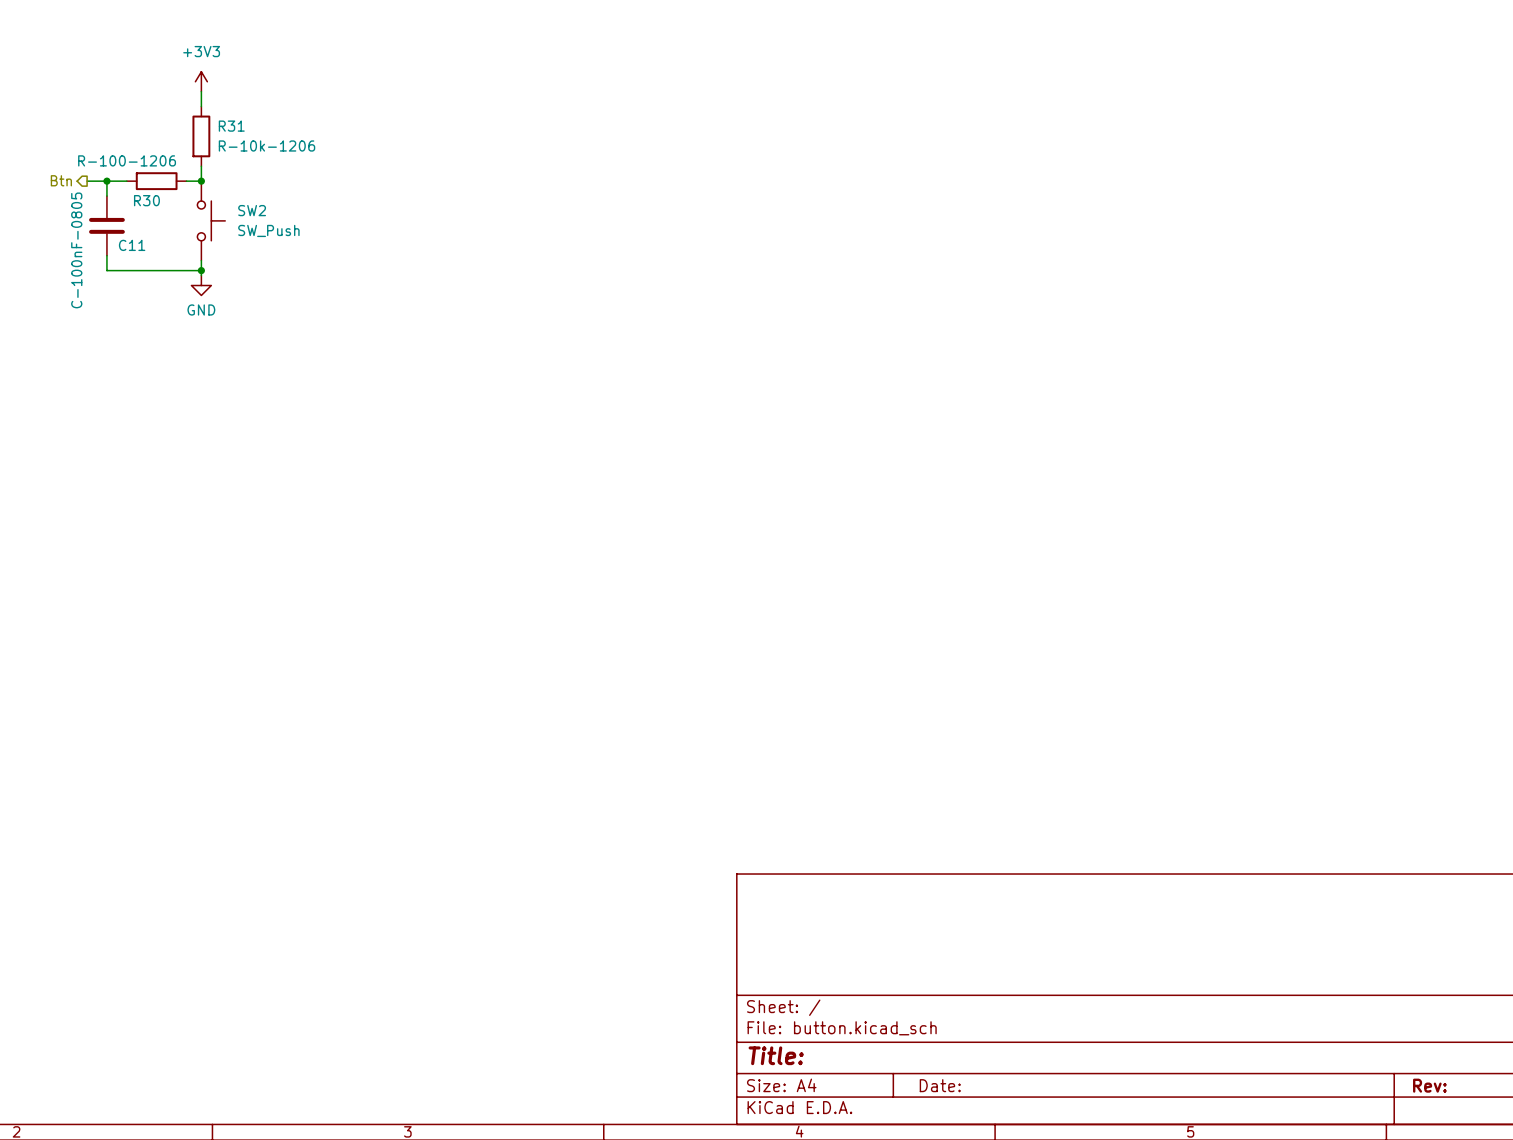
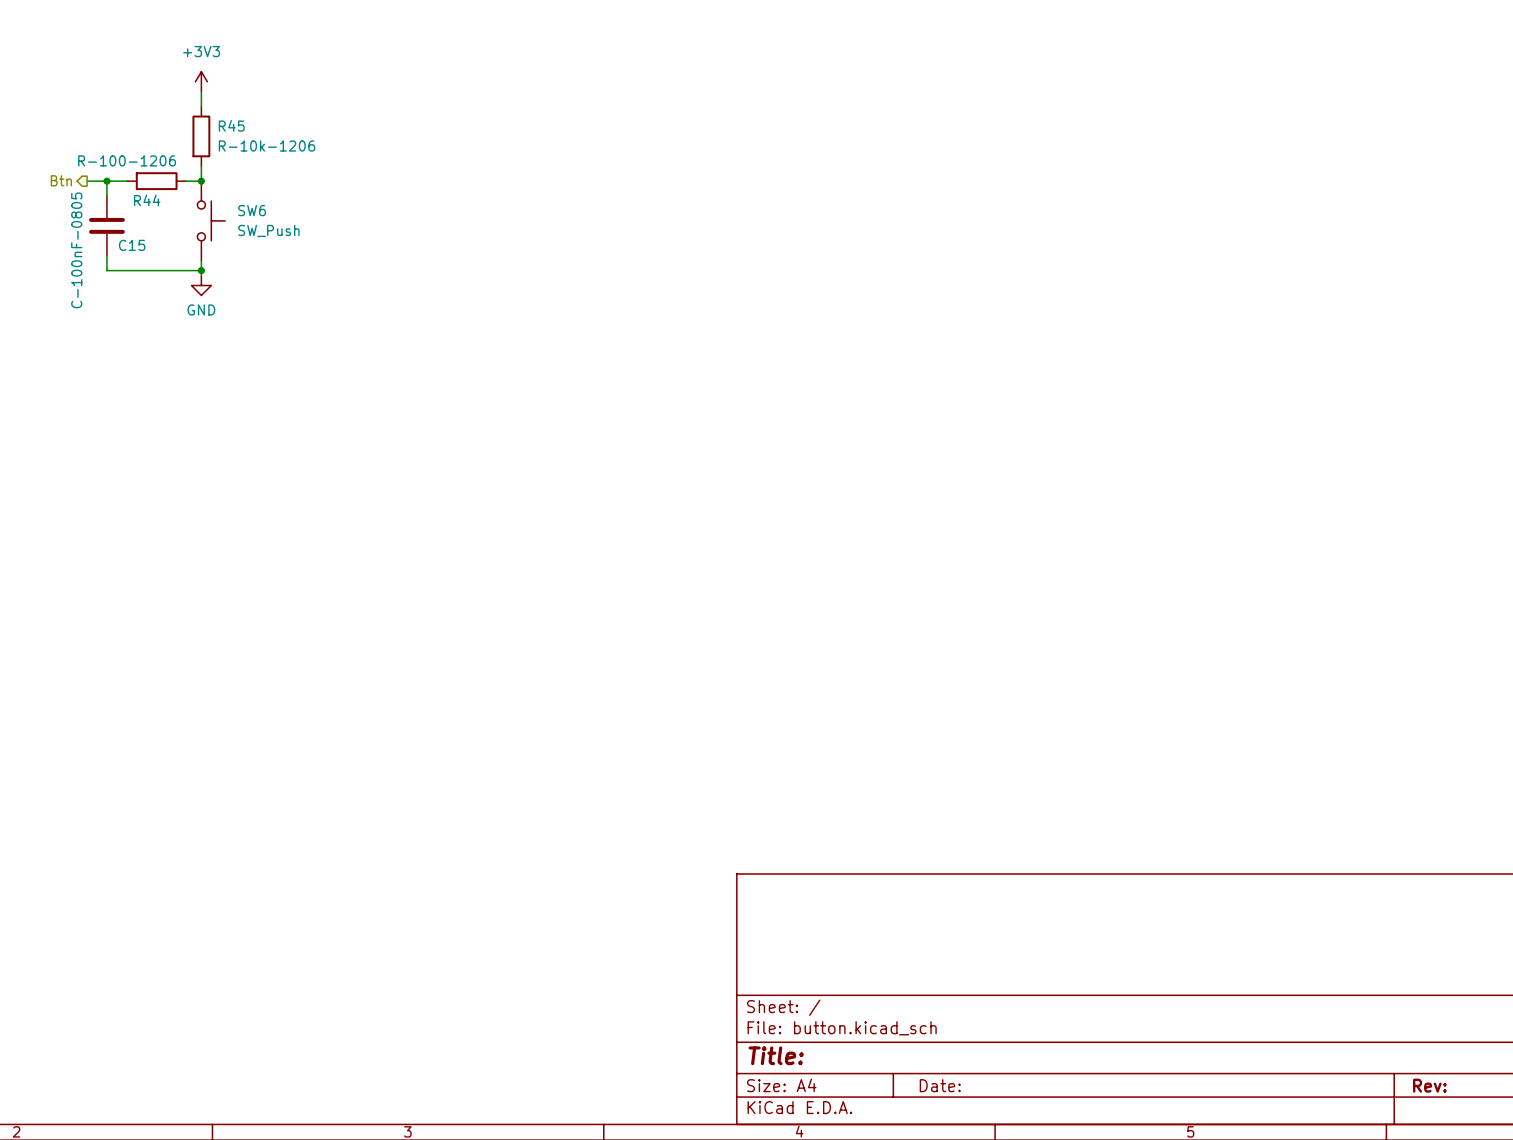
R31 name: R31 (231, 126) -> R45 (231, 125)
R30 name: R30 (146, 200) -> R44 (147, 200)
SW2 name: SW2 (252, 210) -> SW6 (252, 210)
C11 name: C11 (132, 245) -> C15 (132, 245)

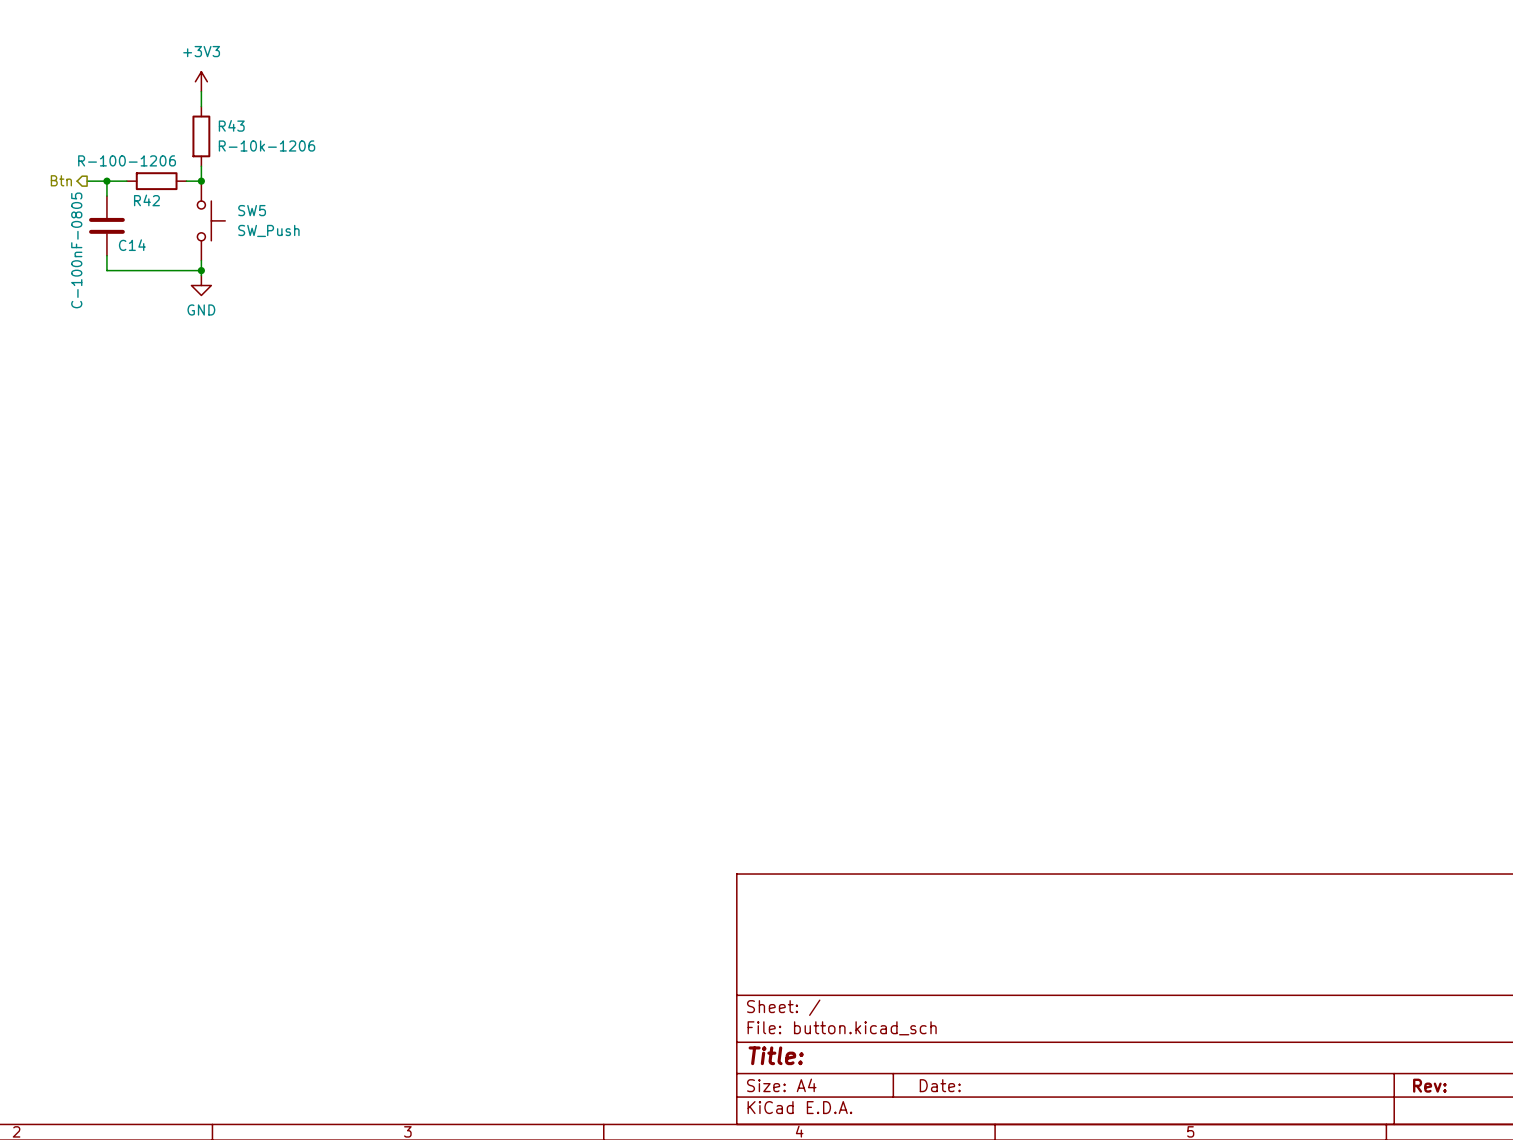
R45 name: R45 (231, 125) -> R43 (231, 125)
R44 name: R44 (147, 200) -> R42 (146, 200)
SW6 name: SW6 (252, 210) -> SW5 (252, 210)
C15 name: C15 (132, 245) -> C14 (132, 245)

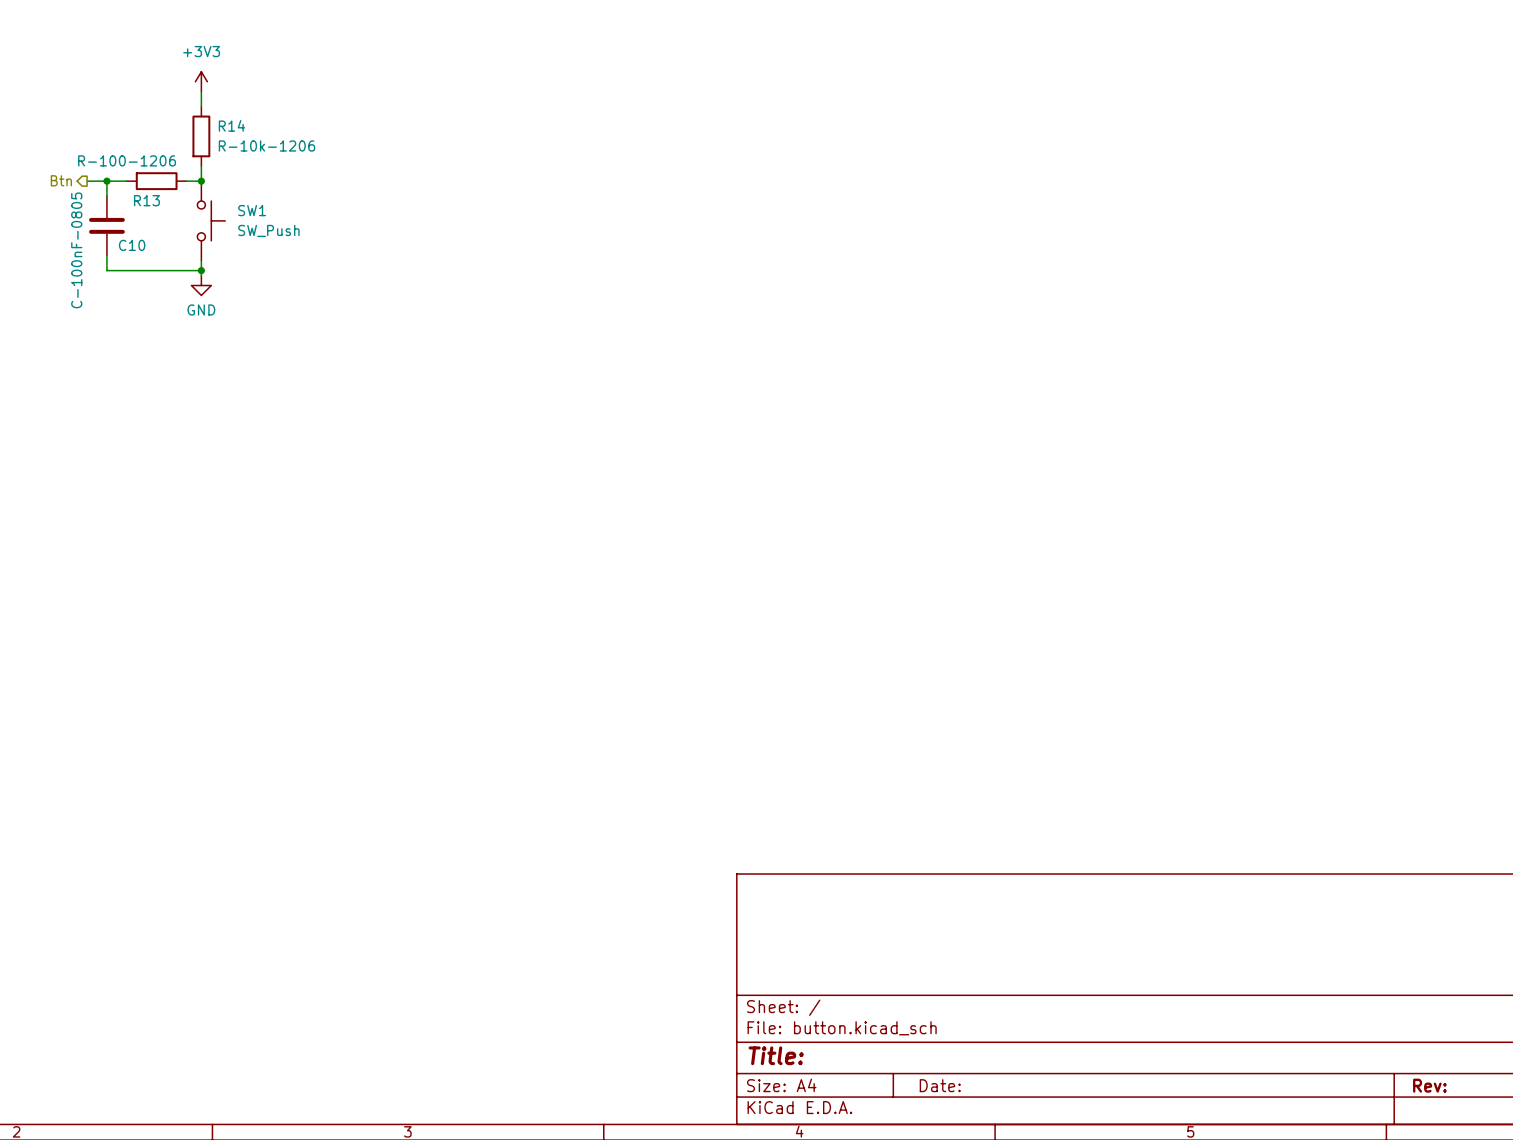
R43 name: R43 (231, 125) -> R14 (231, 125)
R42 name: R42 (146, 200) -> R13 (146, 200)
SW5 name: SW5 (252, 210) -> SW1 (252, 210)
C14 name: C14 (132, 245) -> C10 (132, 245)

